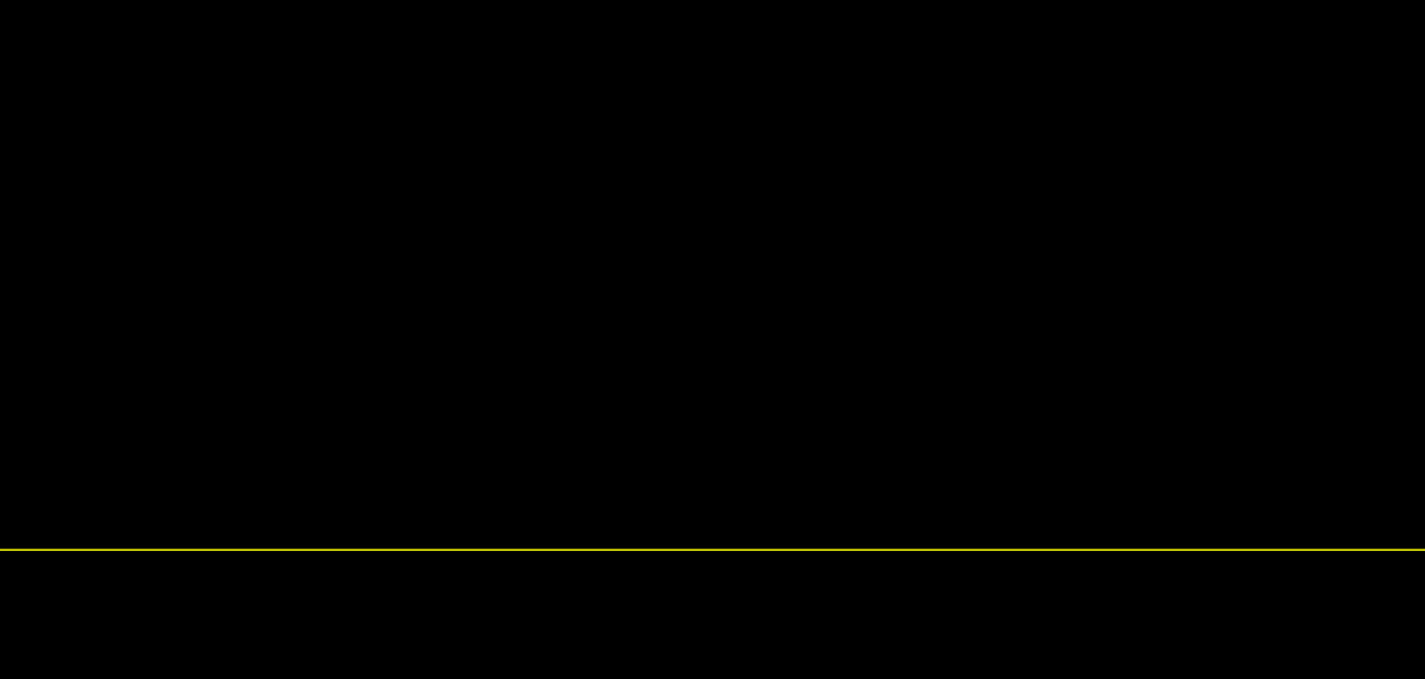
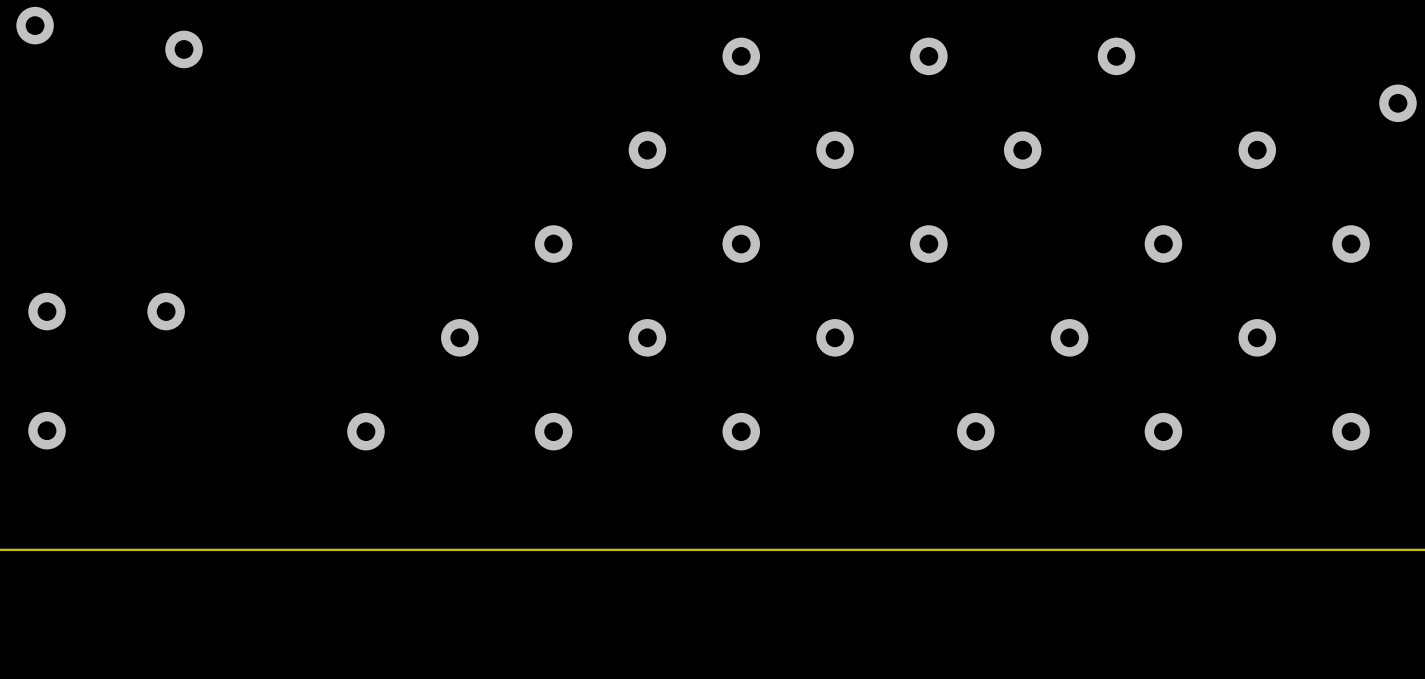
via: none -> (35, 25)
via: none -> (184, 49)
via: none -> (741, 56)
via: none -> (928, 56)
via: none -> (1116, 56)
via: none -> (1397, 103)
via: none -> (647, 150)
via: none -> (835, 150)
via: none -> (1022, 150)
via: none -> (1257, 150)
via: none -> (553, 244)
via: none -> (741, 244)
via: none -> (928, 244)
via: none -> (1163, 244)
via: none -> (1351, 244)
via: none -> (47, 311)
via: none -> (166, 311)
via: none -> (459, 337)
via: none -> (647, 337)
via: none -> (835, 337)
via: none -> (1069, 337)
via: none -> (1257, 337)
via: none -> (47, 430)
via: none -> (365, 431)
via: none -> (553, 431)
via: none -> (741, 431)
via: none -> (975, 431)
via: none -> (1163, 431)
via: none -> (1351, 431)

